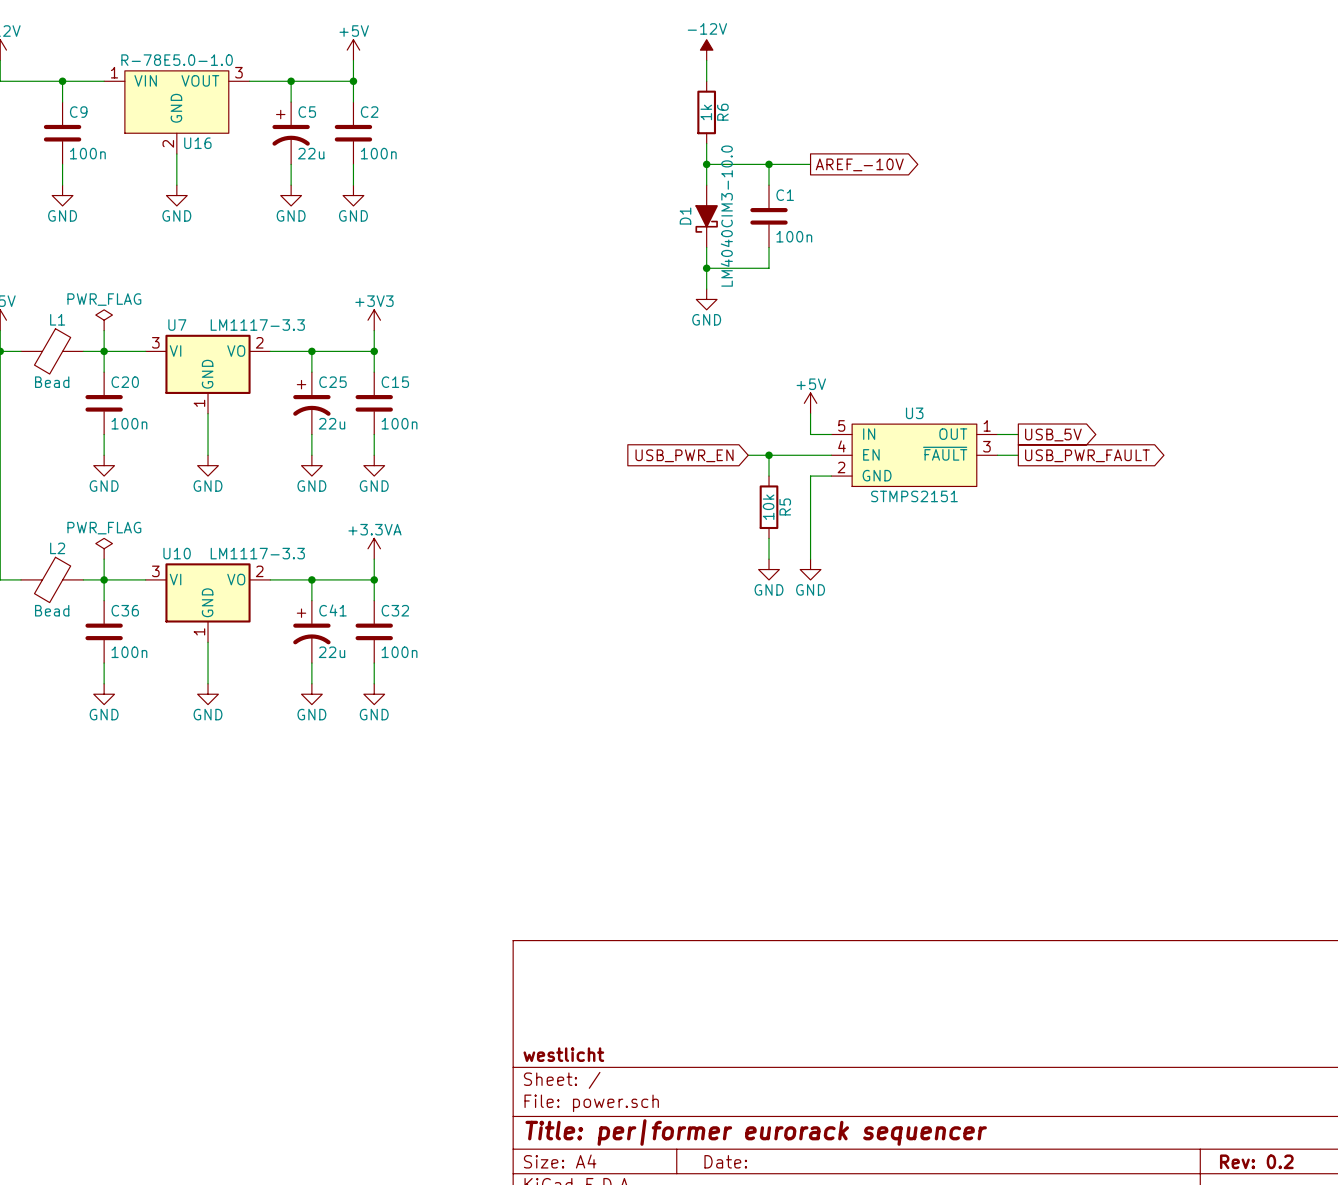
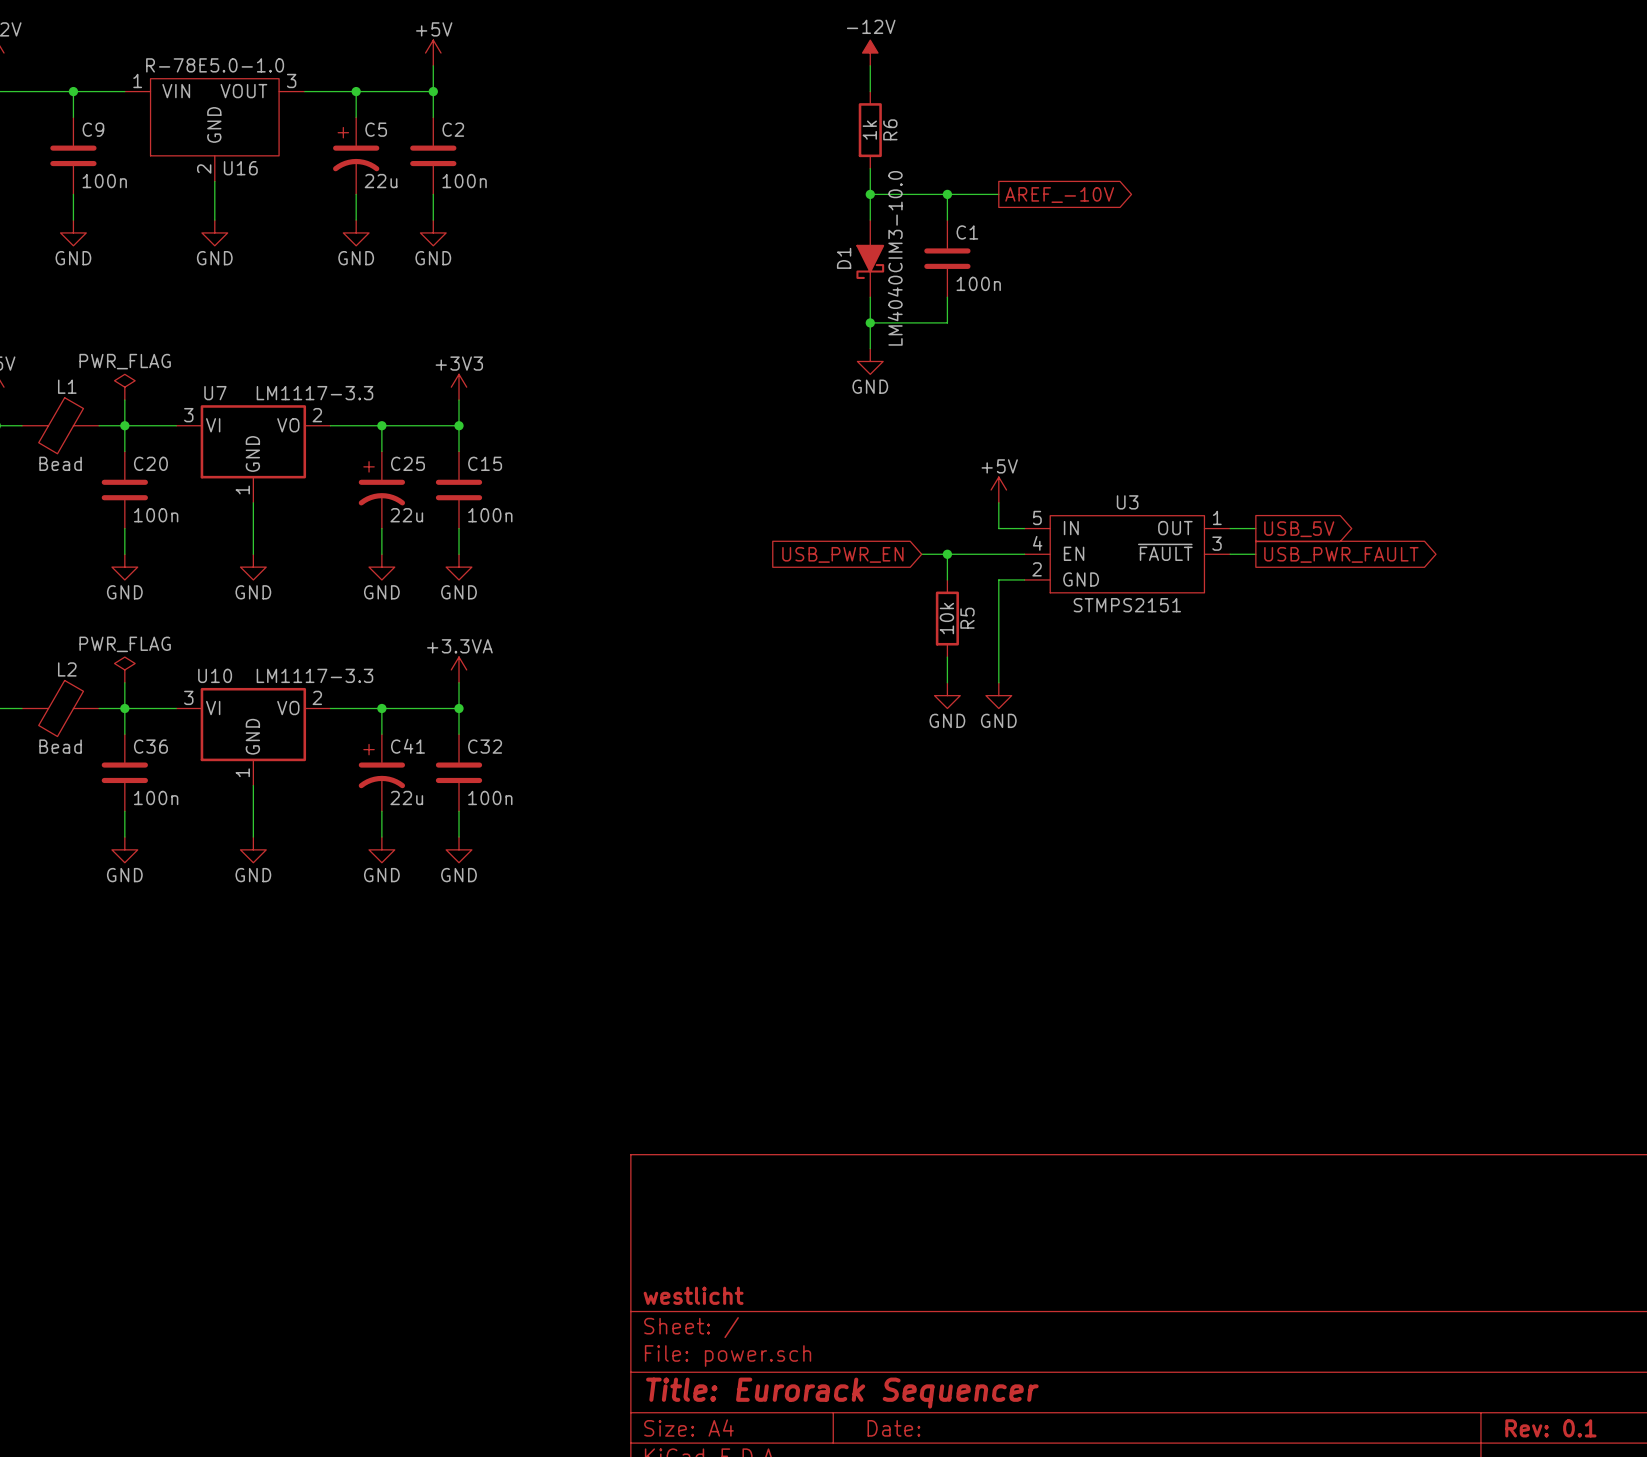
title block: Title: per|former eurorack sequencer (756, 1132) -> Title: Eurorack Sequencer (842, 1393)
title block: Rev: 0.2 (1256, 1161) -> Rev: 0.1 (1550, 1428)

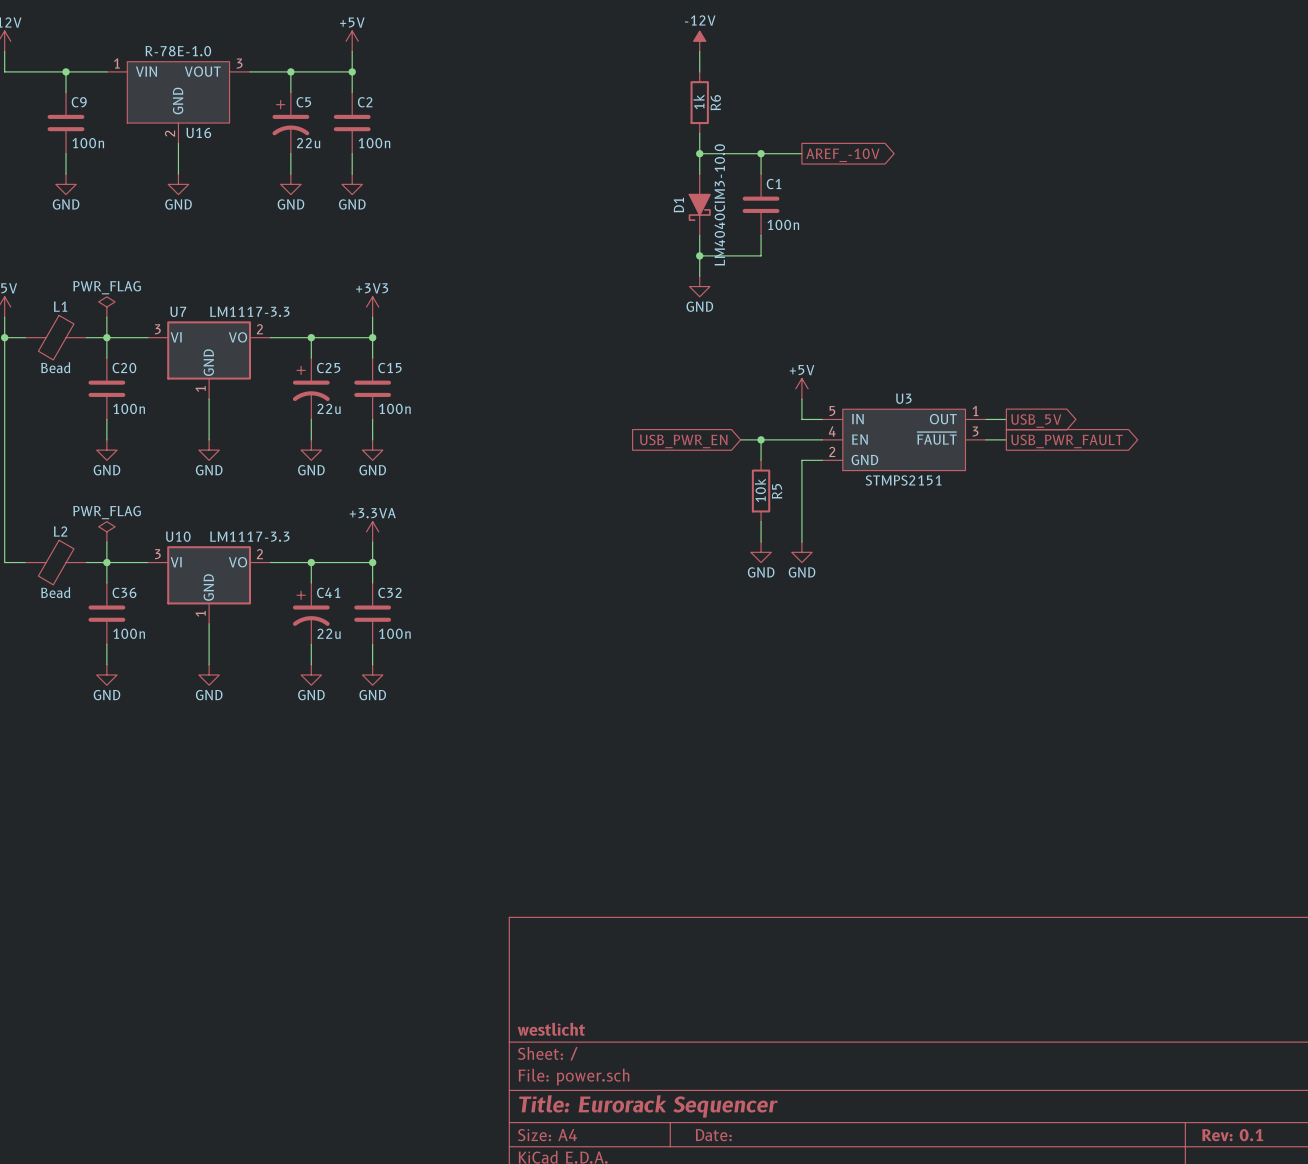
U16 value: R-78E5.0-1.0 (215, 65) -> R-78E-1.0 (178, 51)

